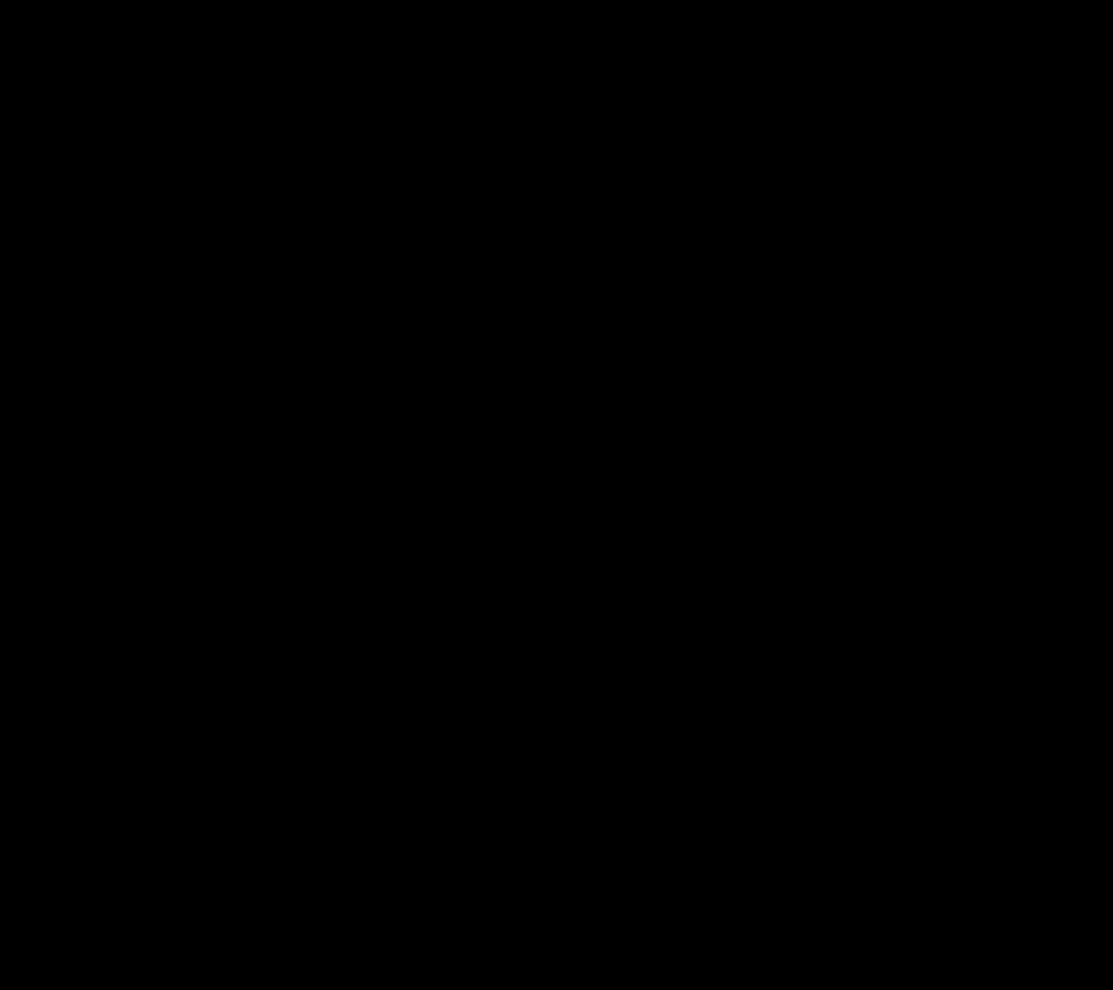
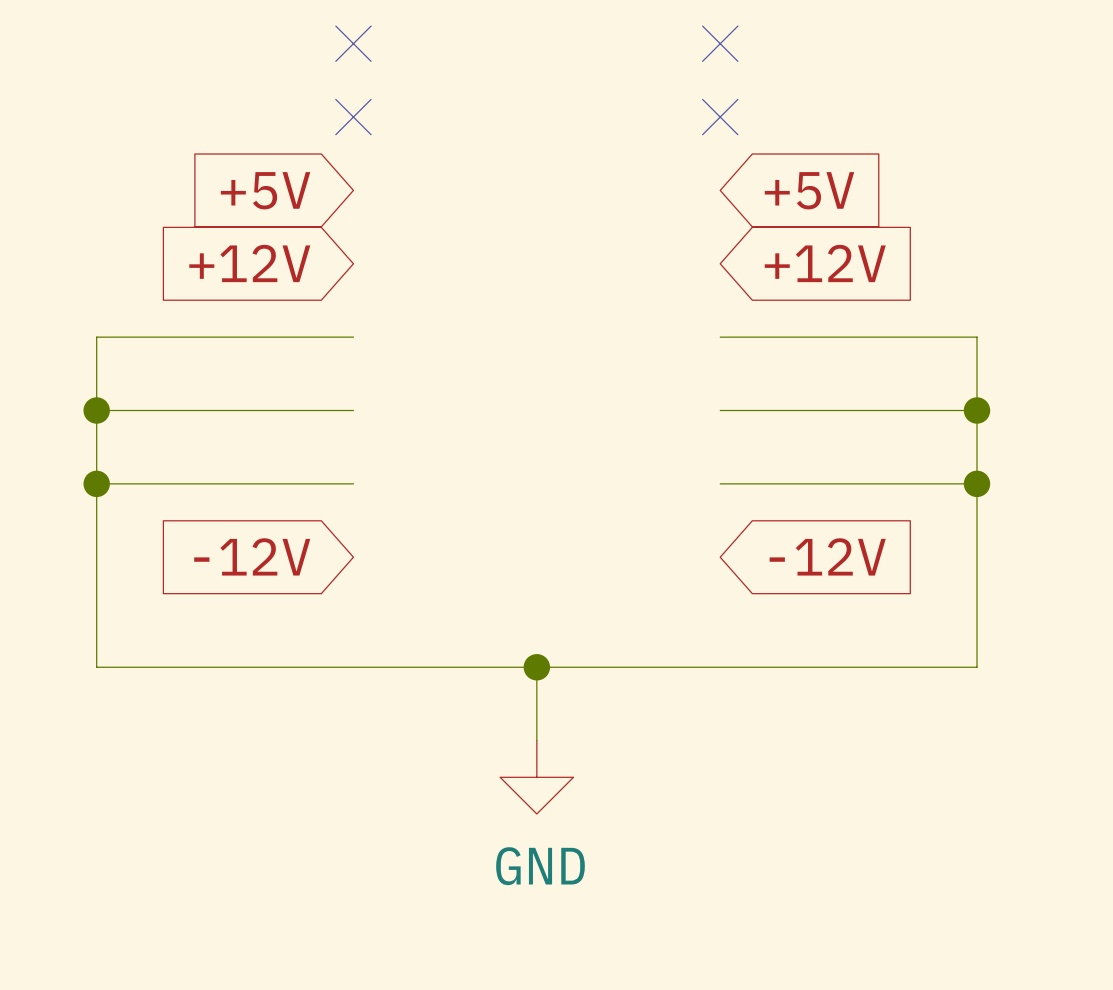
no-connect mark: none -> (353, 43)
no-connect mark: none -> (720, 43)
no-connect mark: none -> (353, 117)
no-connect mark: none -> (720, 117)
global label: none -> +5V (265, 190)
global label: none -> +5V (809, 190)
global label: none -> +12V (249, 263)
global label: none -> +12V (825, 263)
wire: none -> (353, 337) (96, 337) (96, 667) (977, 667) (977, 337) (720, 337)
wire: none -> (96, 410) (353, 410)
junction: none -> (96, 410)
wire: none -> (720, 410) (977, 410)
junction: none -> (977, 410)
wire: none -> (96, 483) (353, 483)
junction: none -> (96, 483)
wire: none -> (720, 483) (977, 483)
junction: none -> (977, 483)
global label: none -> -12V (252, 556)
global label: none -> -12V (827, 556)
wire: none -> (536, 667) (536, 740)
junction: none -> (536, 667)
power symbol: none -> GND (536, 777)

